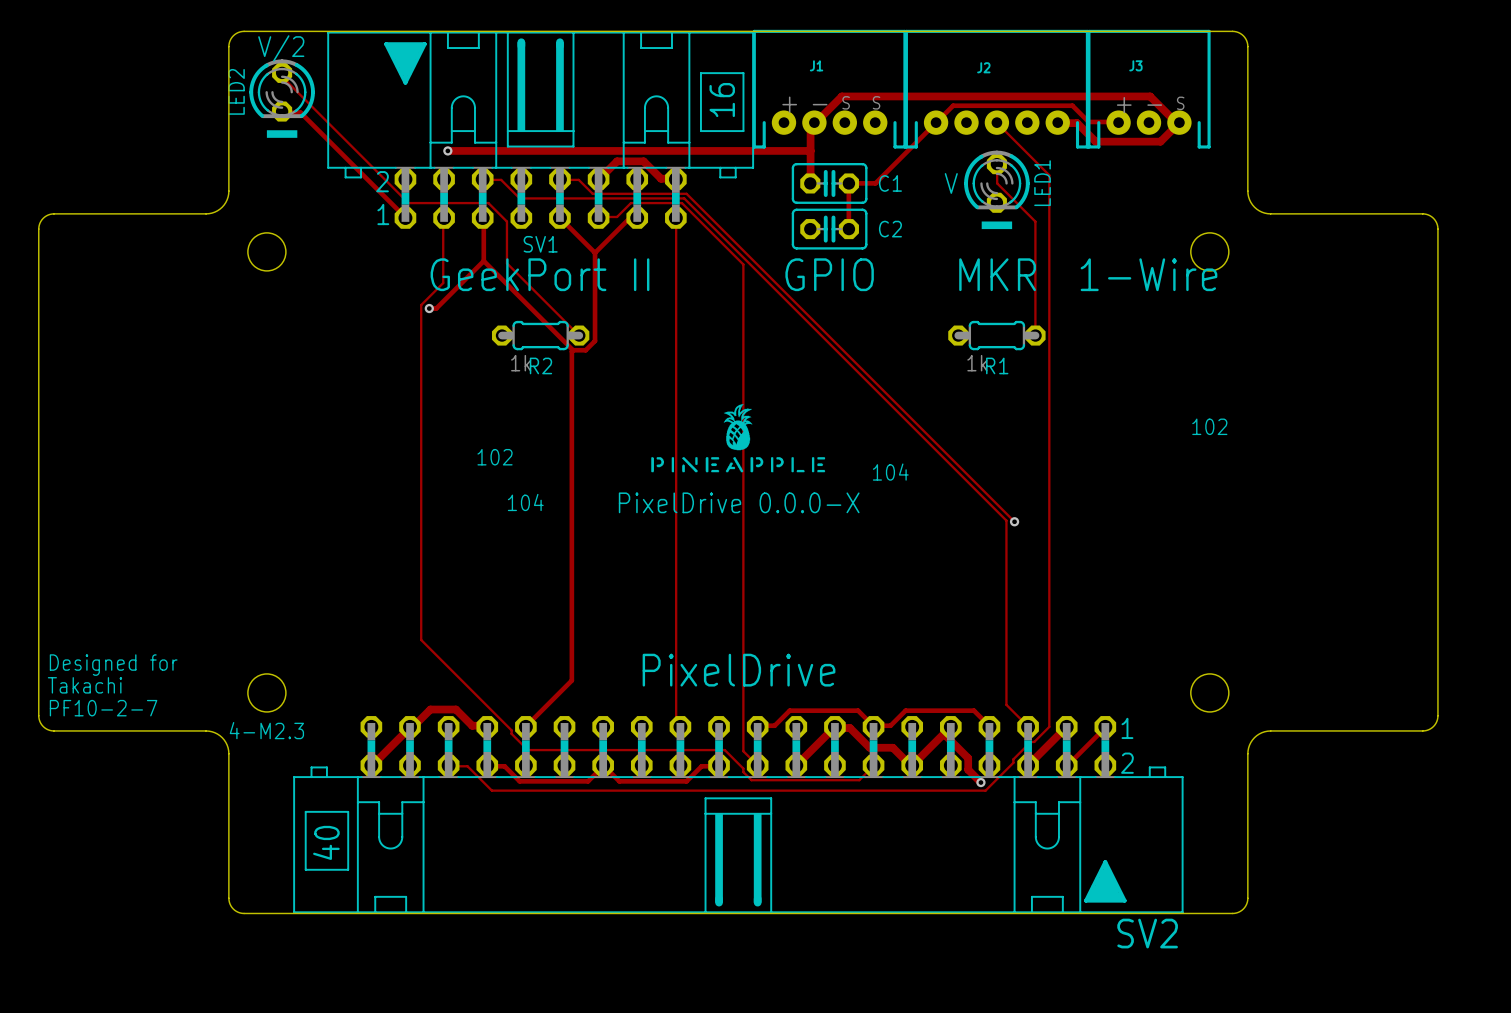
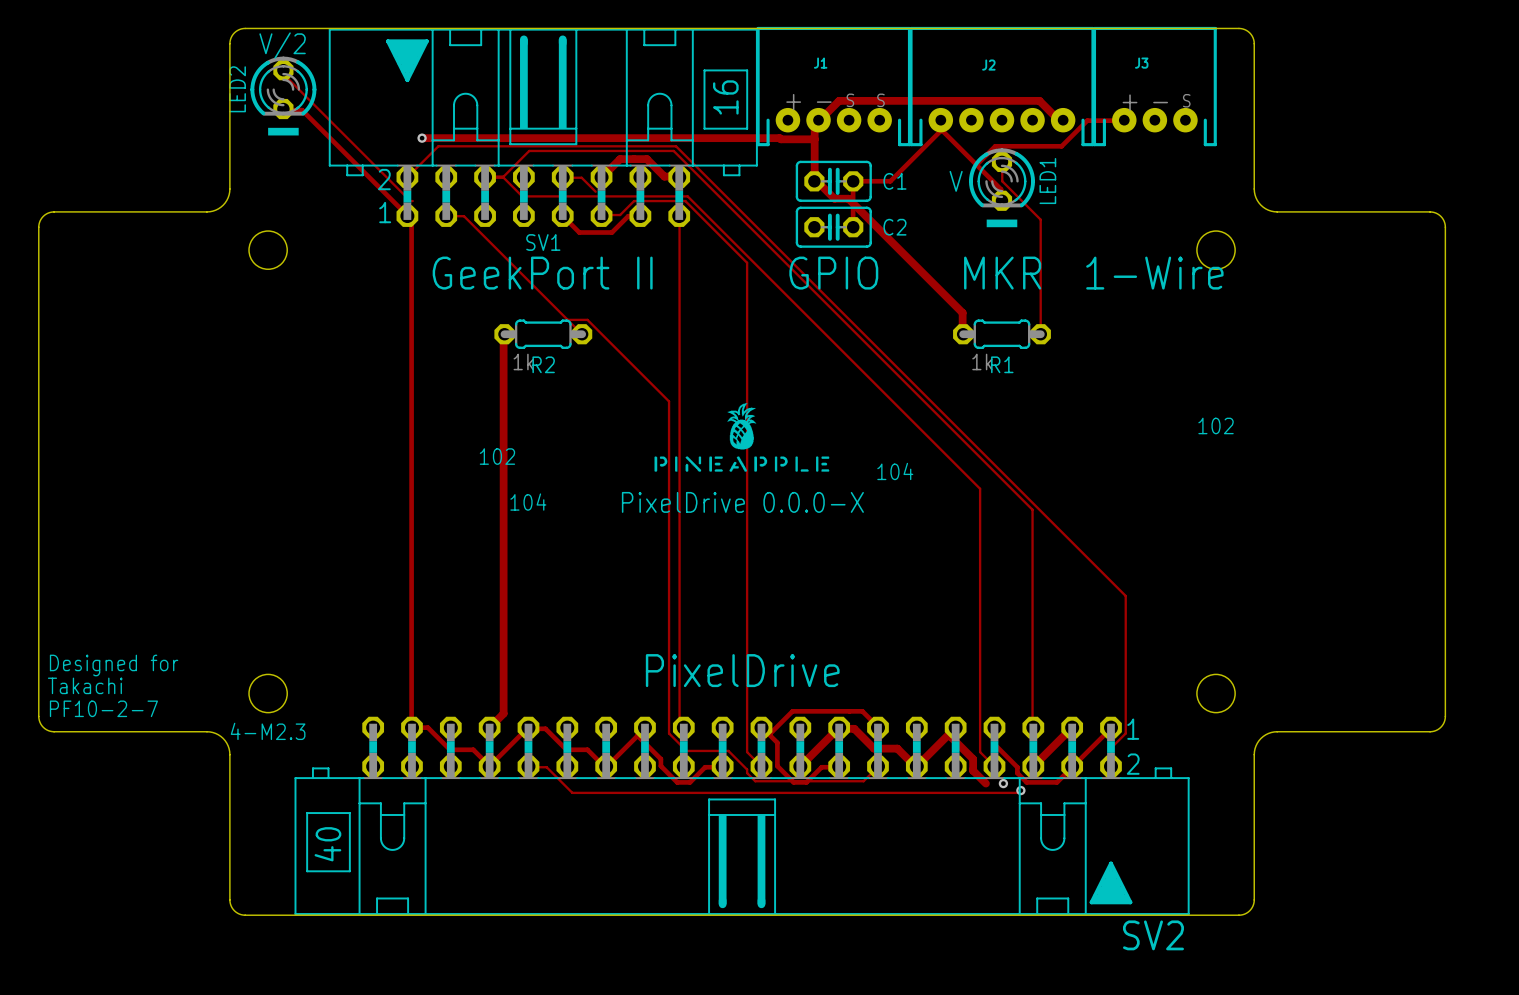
track: (834, 103) (841, 96) (1150, 96) (1175, 121) (1179, 122) (1160, 141) (1095, 141) (1077, 123) (1057, 122) -> (839, 100) (1039, 100) (1058, 119) (1063, 120)
track: (996, 122) (1049, 175) (1049, 726) (1013, 759) (1013, 762) (985, 790) (491, 790) (467, 766) (448, 765) -> none
track: (1118, 122) (1088, 121) (1072, 105) (953, 105) (875, 183) -> (1124, 120) (1087, 120) (1061, 146) (995, 146) (976, 164)
track: none -> (422, 138) (814, 139)
track: (447, 150) (810, 150) -> none
via position: (447, 150) -> (422, 138)
track: none -> (407, 177) (438, 146) (676, 146) (1125, 596) (1125, 733) (1111, 747) (1110, 766)
track: none -> (485, 177) (503, 176) (529, 150) (673, 150) (1032, 509) (1032, 726)
track: none -> (814, 181) (818, 182) (834, 198) (848, 198) (962, 312) (963, 334)
track: none -> (879, 181) (890, 181) (940, 131) (940, 120) (941, 129) (1001, 189) (1001, 200)
track: (592, 193) (686, 193) (1014, 521) -> none
track: (410, 203) (488, 203) (506, 221) (506, 263) -> (446, 216) (464, 216) (509, 261)
track: none -> (407, 216) (411, 219) (411, 727) (427, 727) (450, 749) (473, 749) (489, 766) (528, 727) (545, 728) (566, 749) (587, 749) (606, 766) (644, 727)
track: (444, 217) (443, 283) (421, 305) (421, 639) (511, 730) (511, 733) (527, 750) (683, 750) -> (567, 319) (587, 319) (669, 401) (669, 733) (686, 750)
track: (482, 217) (483, 261) -> none
track: (629, 218) (595, 252) -> (632, 216) (628, 216) (611, 232) (579, 232)
track: (576, 234) (595, 252) -> none
track: (595, 252) (595, 340) (585, 350) (573, 350) -> none
track: (483, 261) (573, 350) -> none
track: (483, 261) (436, 308) (429, 308) -> none
via: (429, 308) -> none
track: (573, 350) (571, 680) (525, 726) -> none
track: (975, 489) (1006, 520) (1006, 704) (1027, 725) -> (980, 488) (980, 752) (994, 766)
via: (1014, 521) -> none
track: (789, 710) (774, 725) (757, 726) -> (793, 711) (770, 733) (761, 727) (777, 742) (777, 766) (793, 782) (806, 782) (821, 767) (839, 766)
track: (410, 726) (414, 725) (430, 709) (455, 709) (472, 725) (487, 726) -> (504, 334) (503, 713) (489, 727)
track: (410, 726) (371, 765) -> none
track: (873, 726) (890, 725) (905, 710) (973, 710) (989, 726) -> (1072, 766) (1057, 782) (1026, 782) (1017, 773) (1017, 767) (995, 745) (994, 727)
track: (487, 765) (504, 766) (519, 781) (588, 781) (603, 765) (619, 781) (673, 781) -> (637, 735) (660, 759) (660, 766) (677, 782)
track: none -> (528, 766) (546, 767) (572, 792) (1018, 792) (1020, 790)
via position: (980, 782) -> (1003, 783)
via: none -> (1020, 790)

